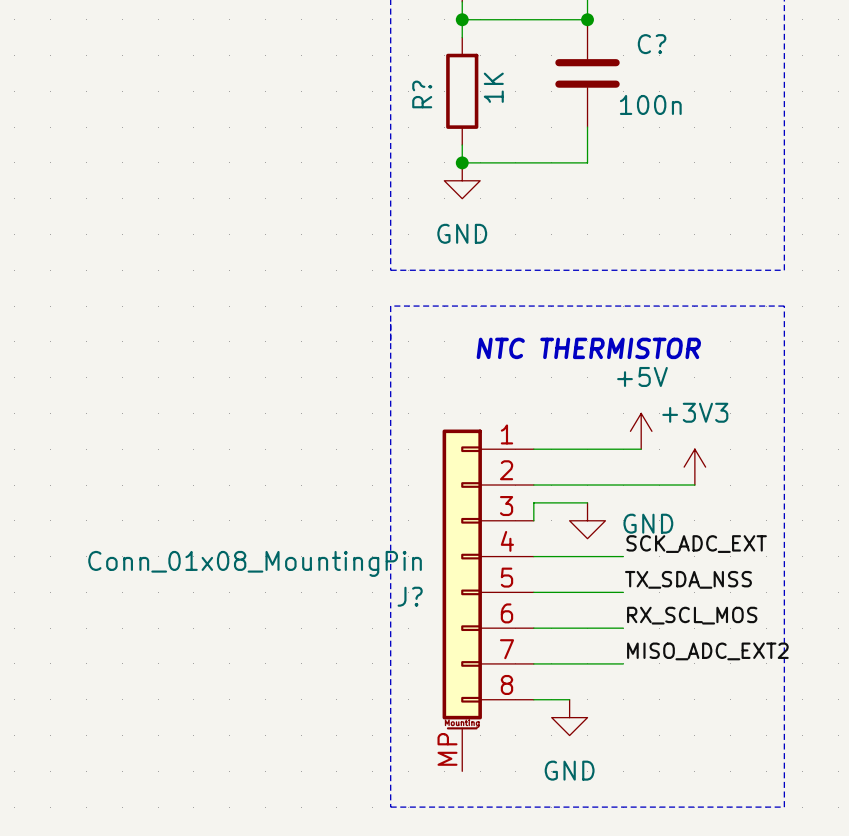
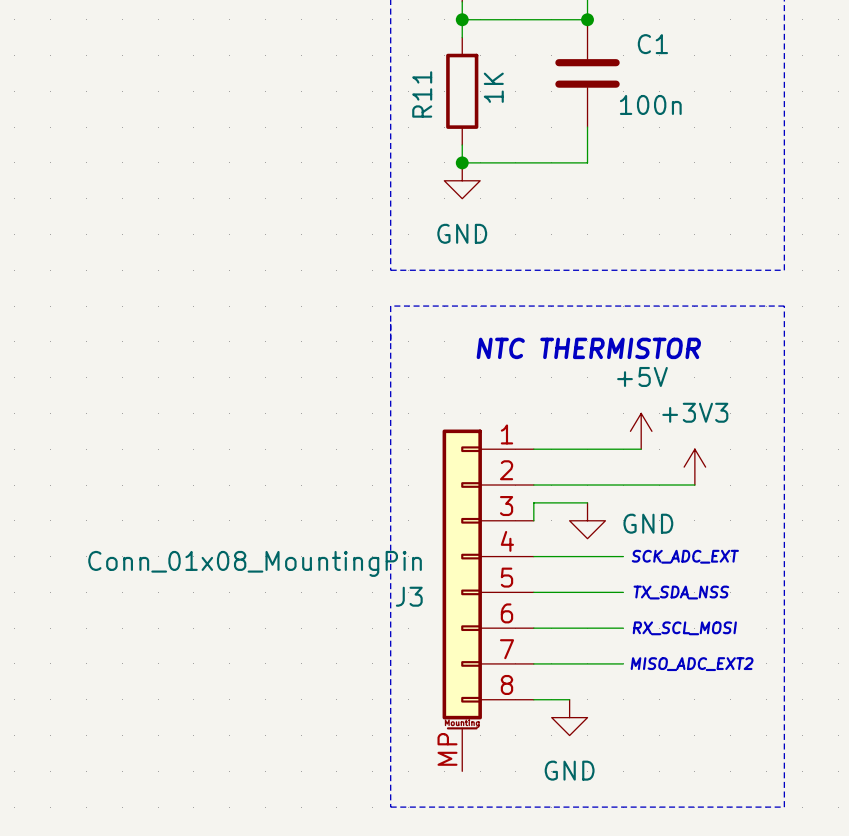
C? name: C? (652, 44) -> C1 (652, 44)
R? name: R? (422, 94) -> R11 (422, 94)
label: SCK_ADC_EXT (696, 544) -> none
text: none -> SCK_ADC_EXT (685, 556)
label: TX_SDA_NSS (688, 579) -> none
text: none -> TX_SDA_NSS (681, 592)
J? name: J? (410, 596) -> J3 (409, 596)
label: RX_SCL_MOS (692, 615) -> none
text: none -> RX_SCL_MOSI (684, 628)
label: MISO_ADC_EXT2 (707, 651) -> none
text: none -> MISO_ADC_EXT2 (692, 664)

